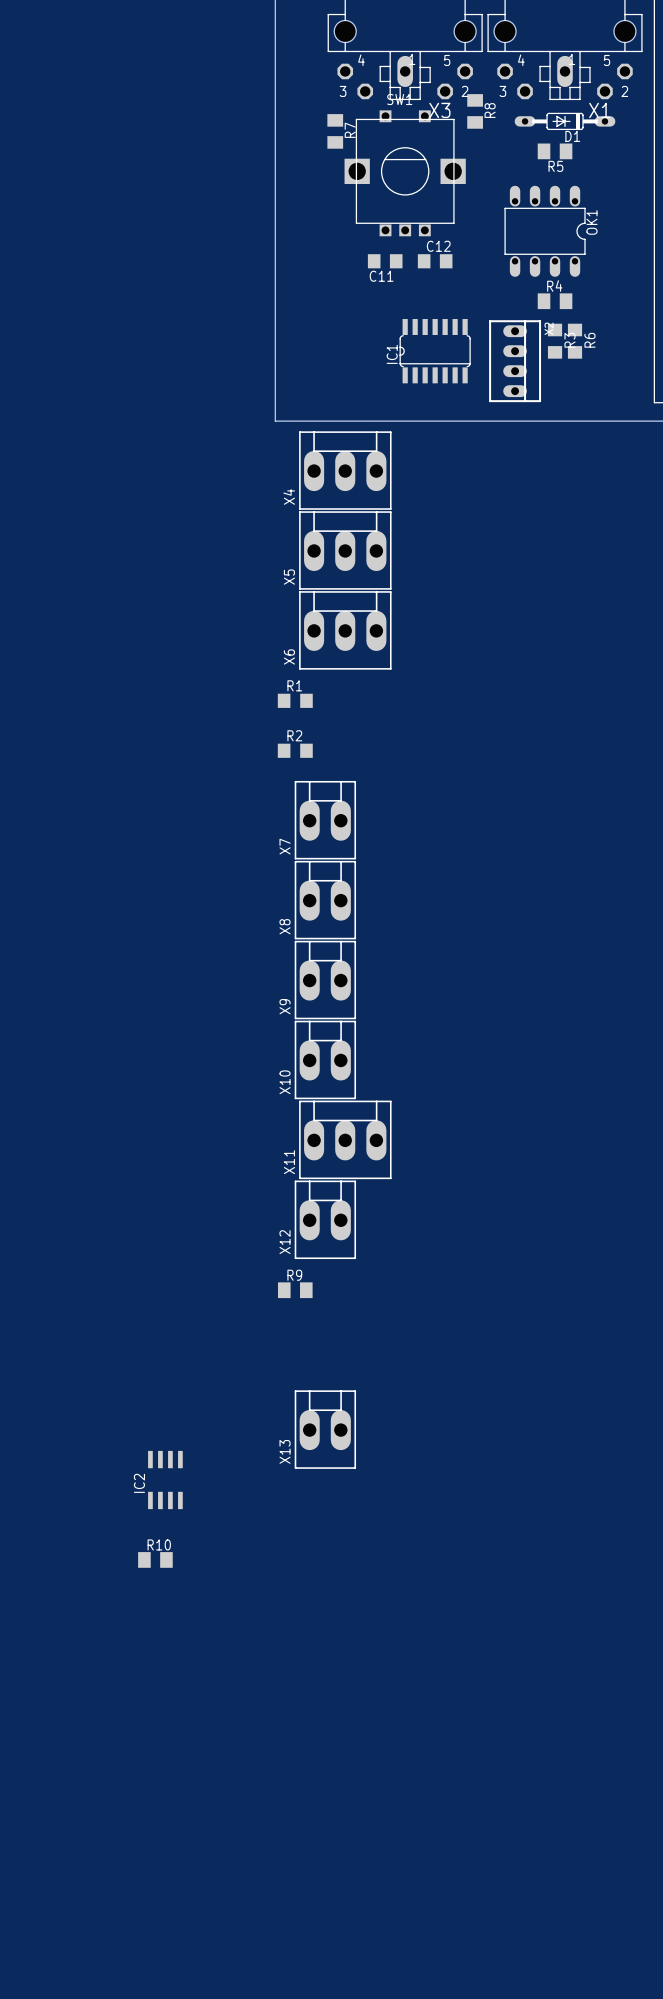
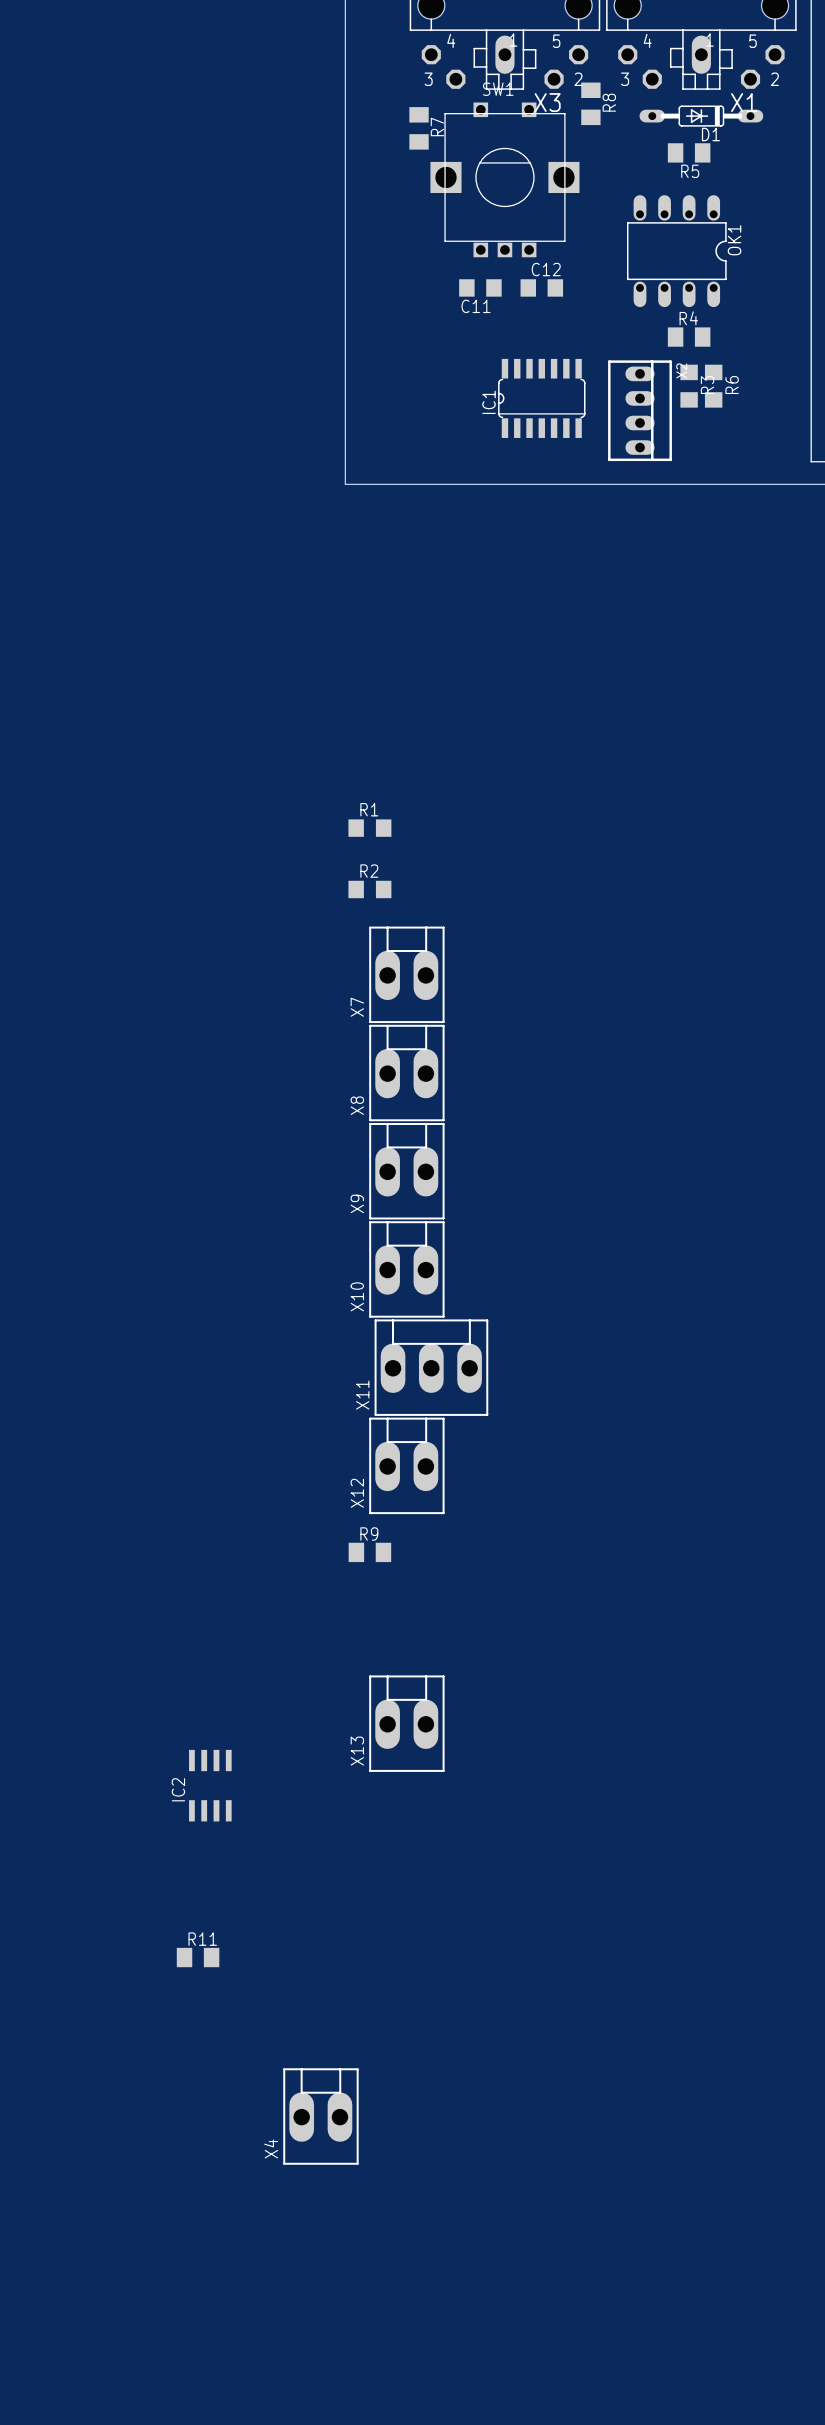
X4 footprint: [299, 431, 392, 510] -> [283, 2068, 359, 2165]
X5: (345, 550) -> none
X6: (345, 630) -> none
R10: (155, 1559) -> none
R11: none -> (198, 1957)

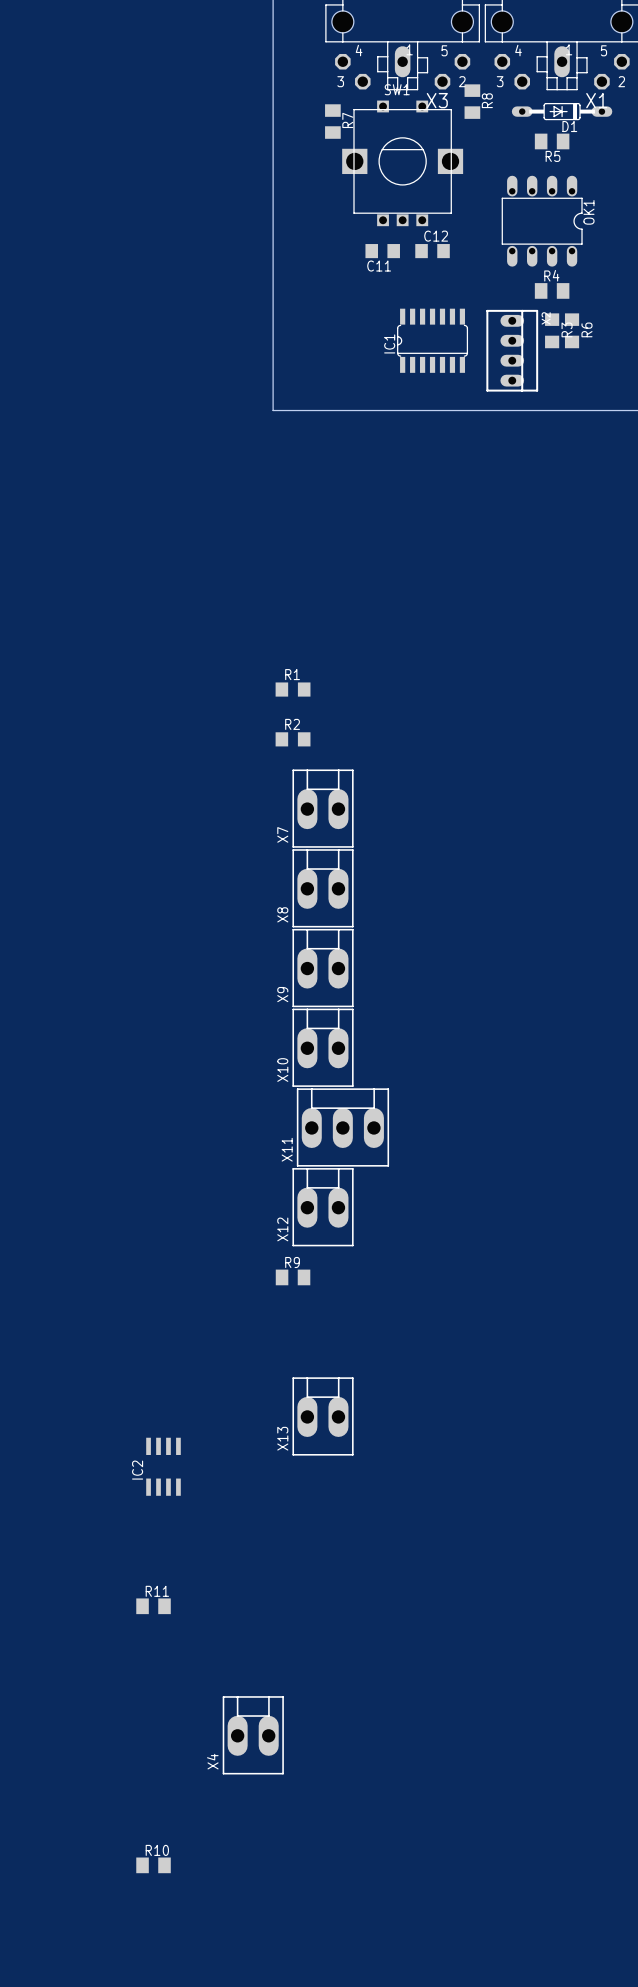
R10: none -> (153, 1865)

